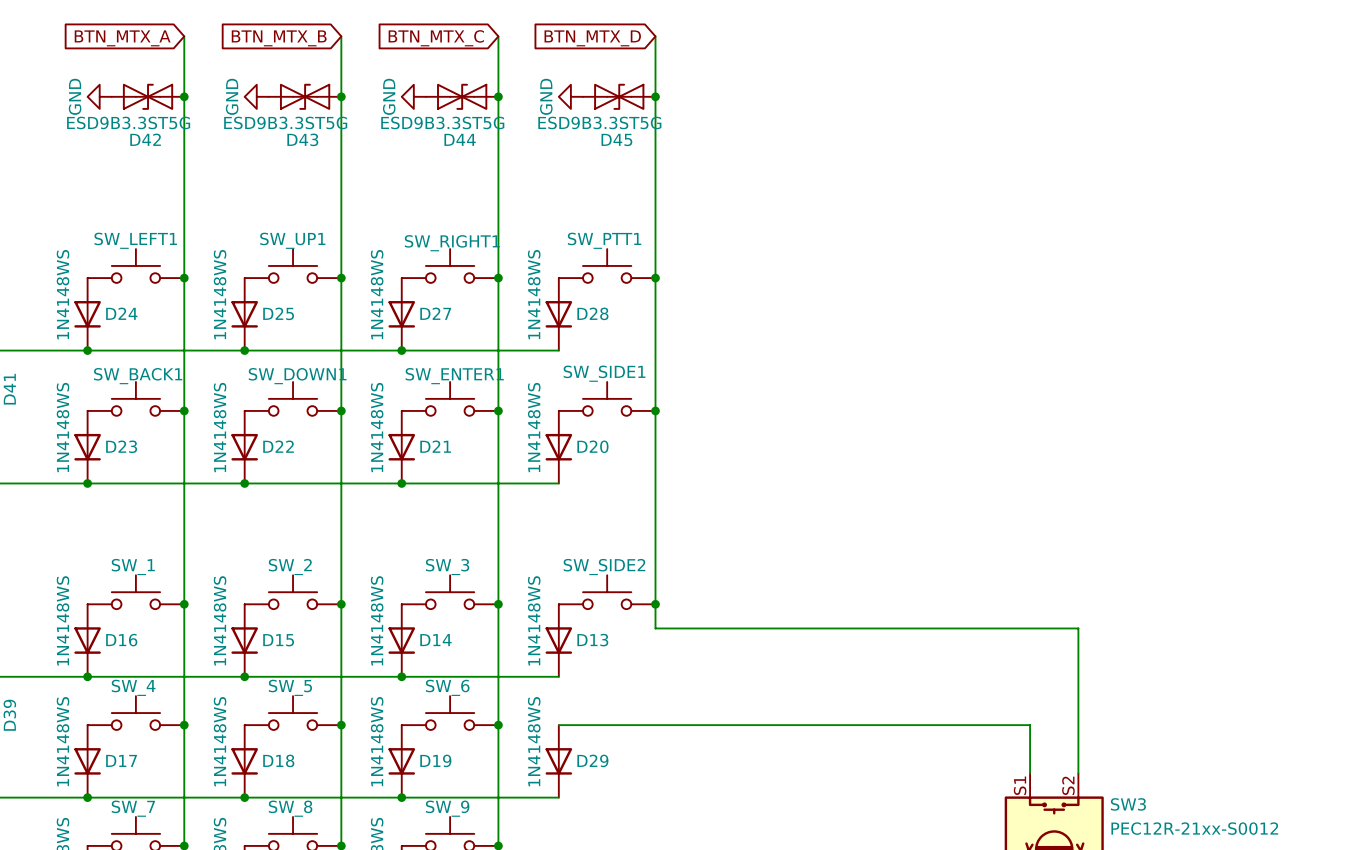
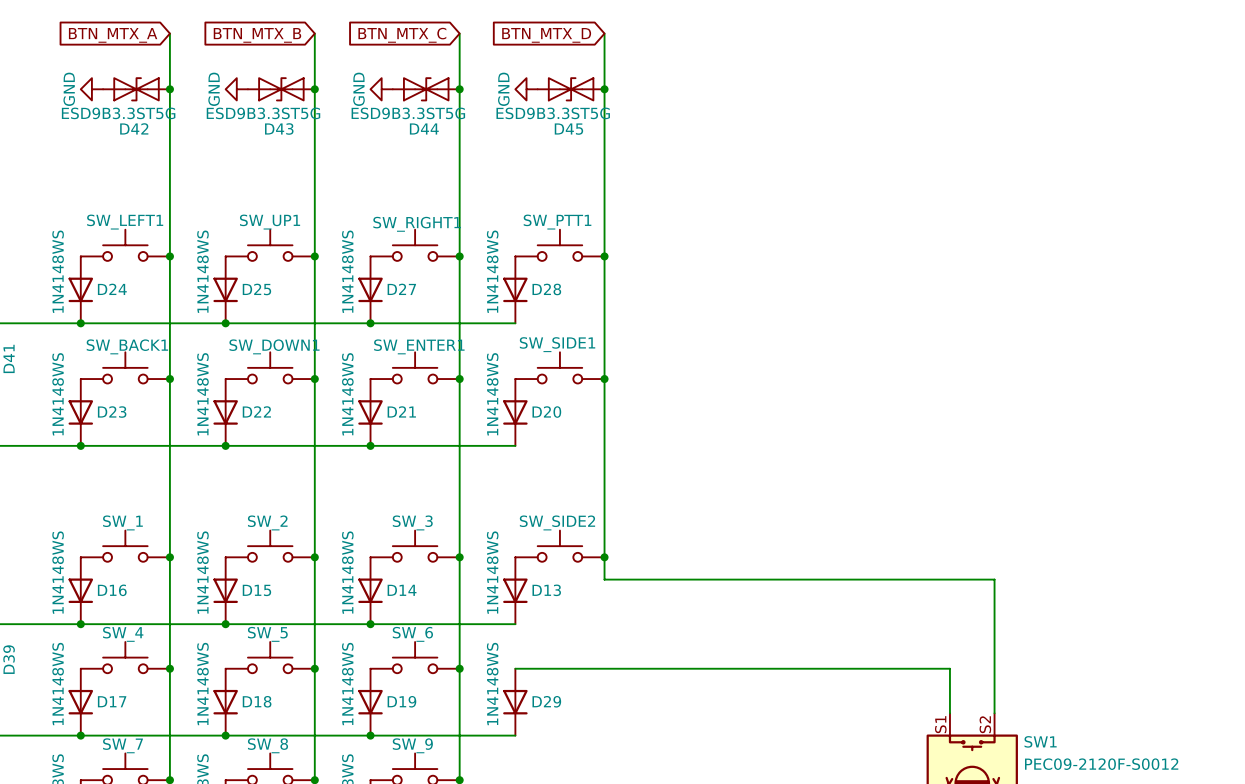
SW3 name: SW3 (1128, 804) -> SW1 (1040, 741)
SW3 value: PEC12R-21xx-S0012 (1194, 828) -> PEC09-2120F-S0012 (1101, 764)

